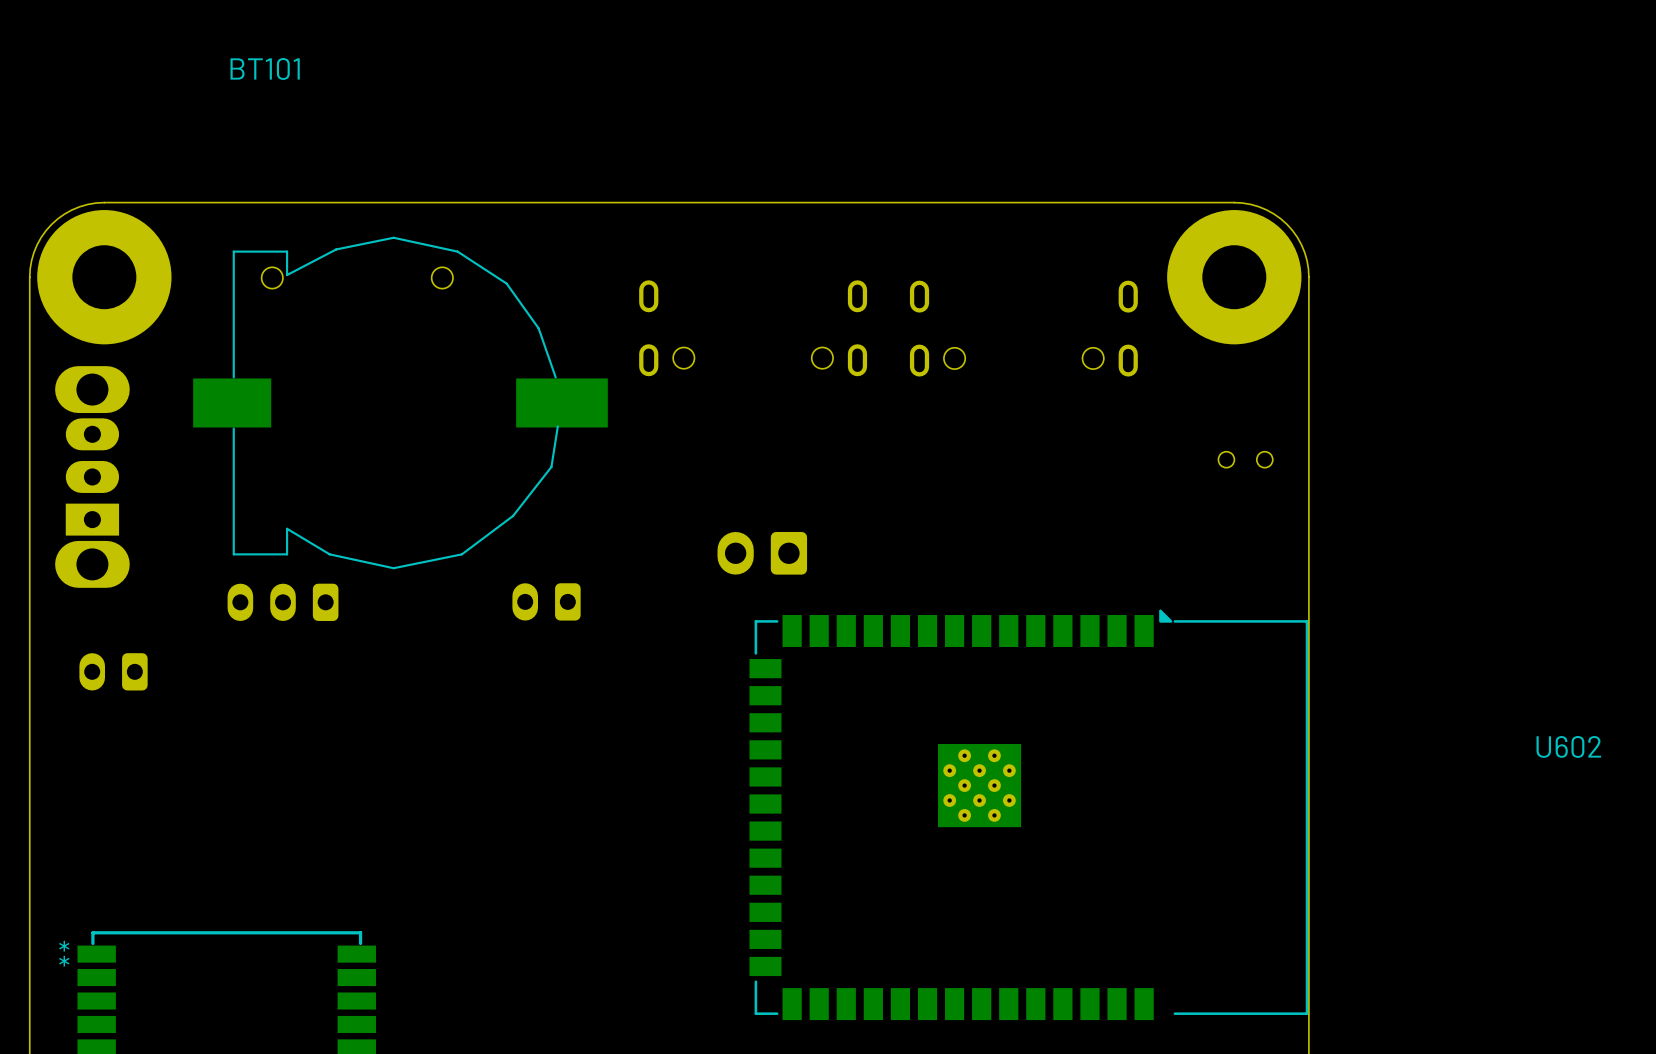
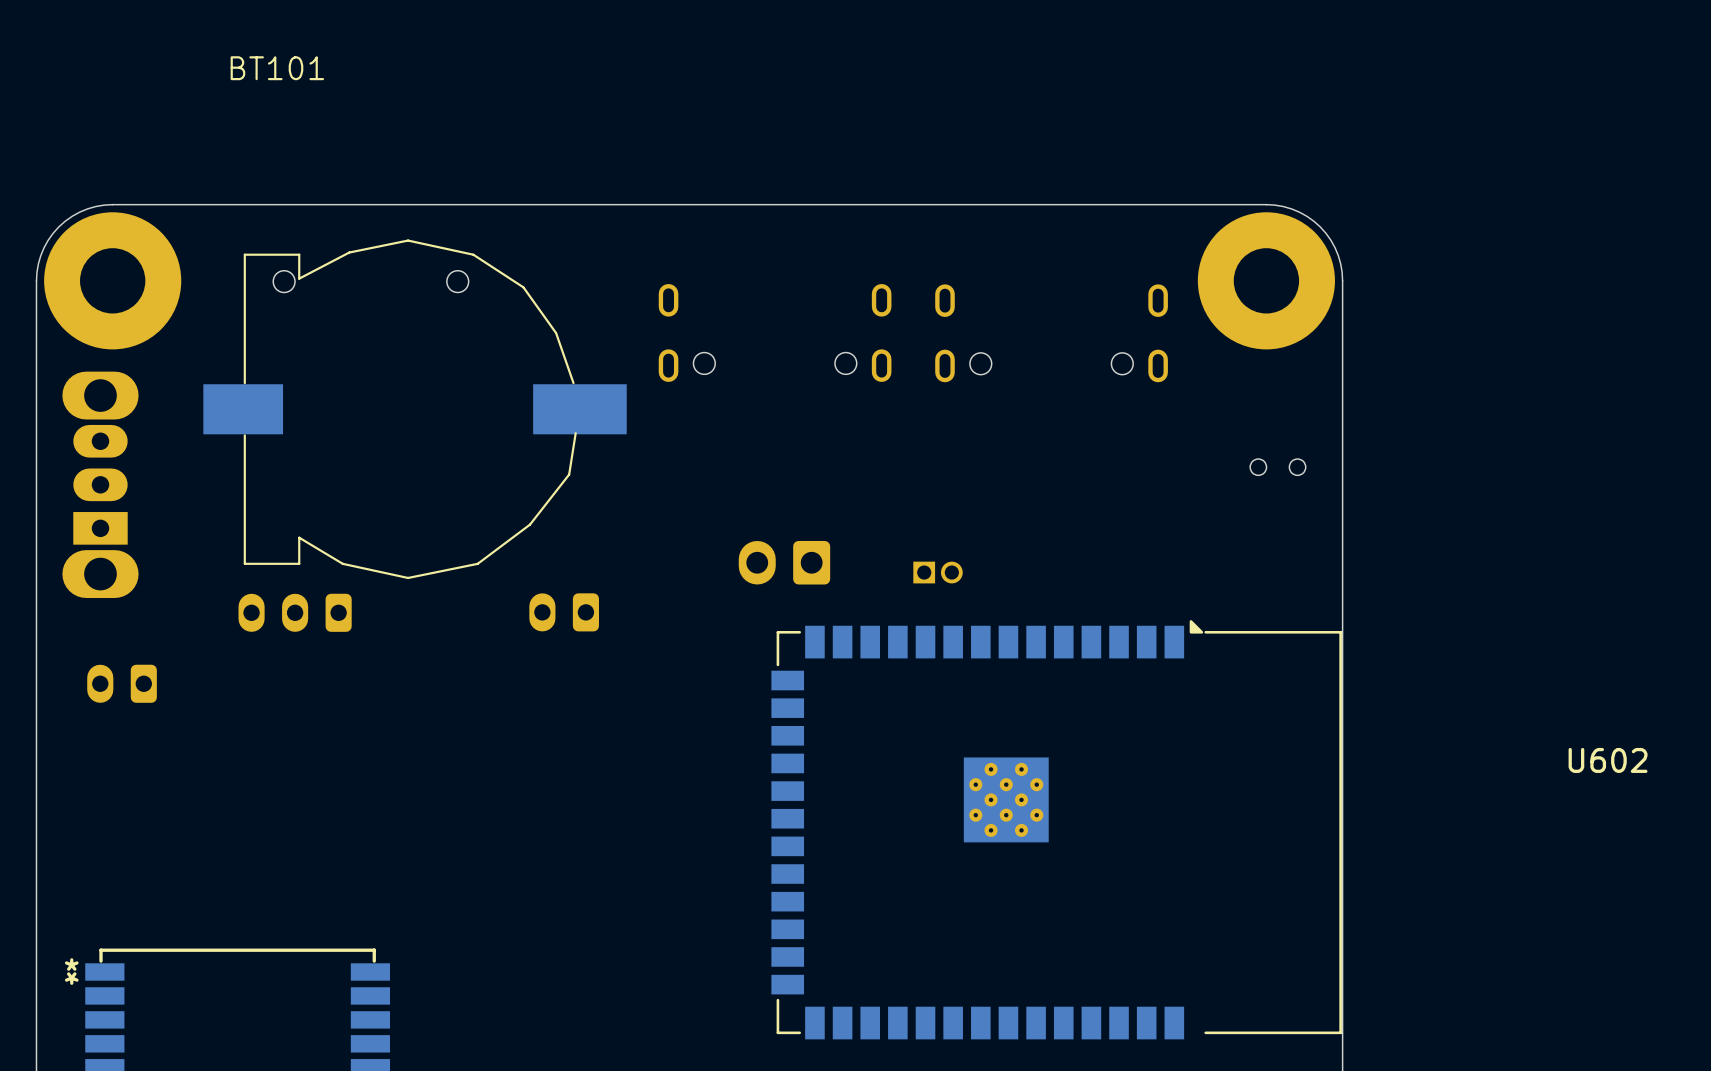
part: none -> (938, 572)

